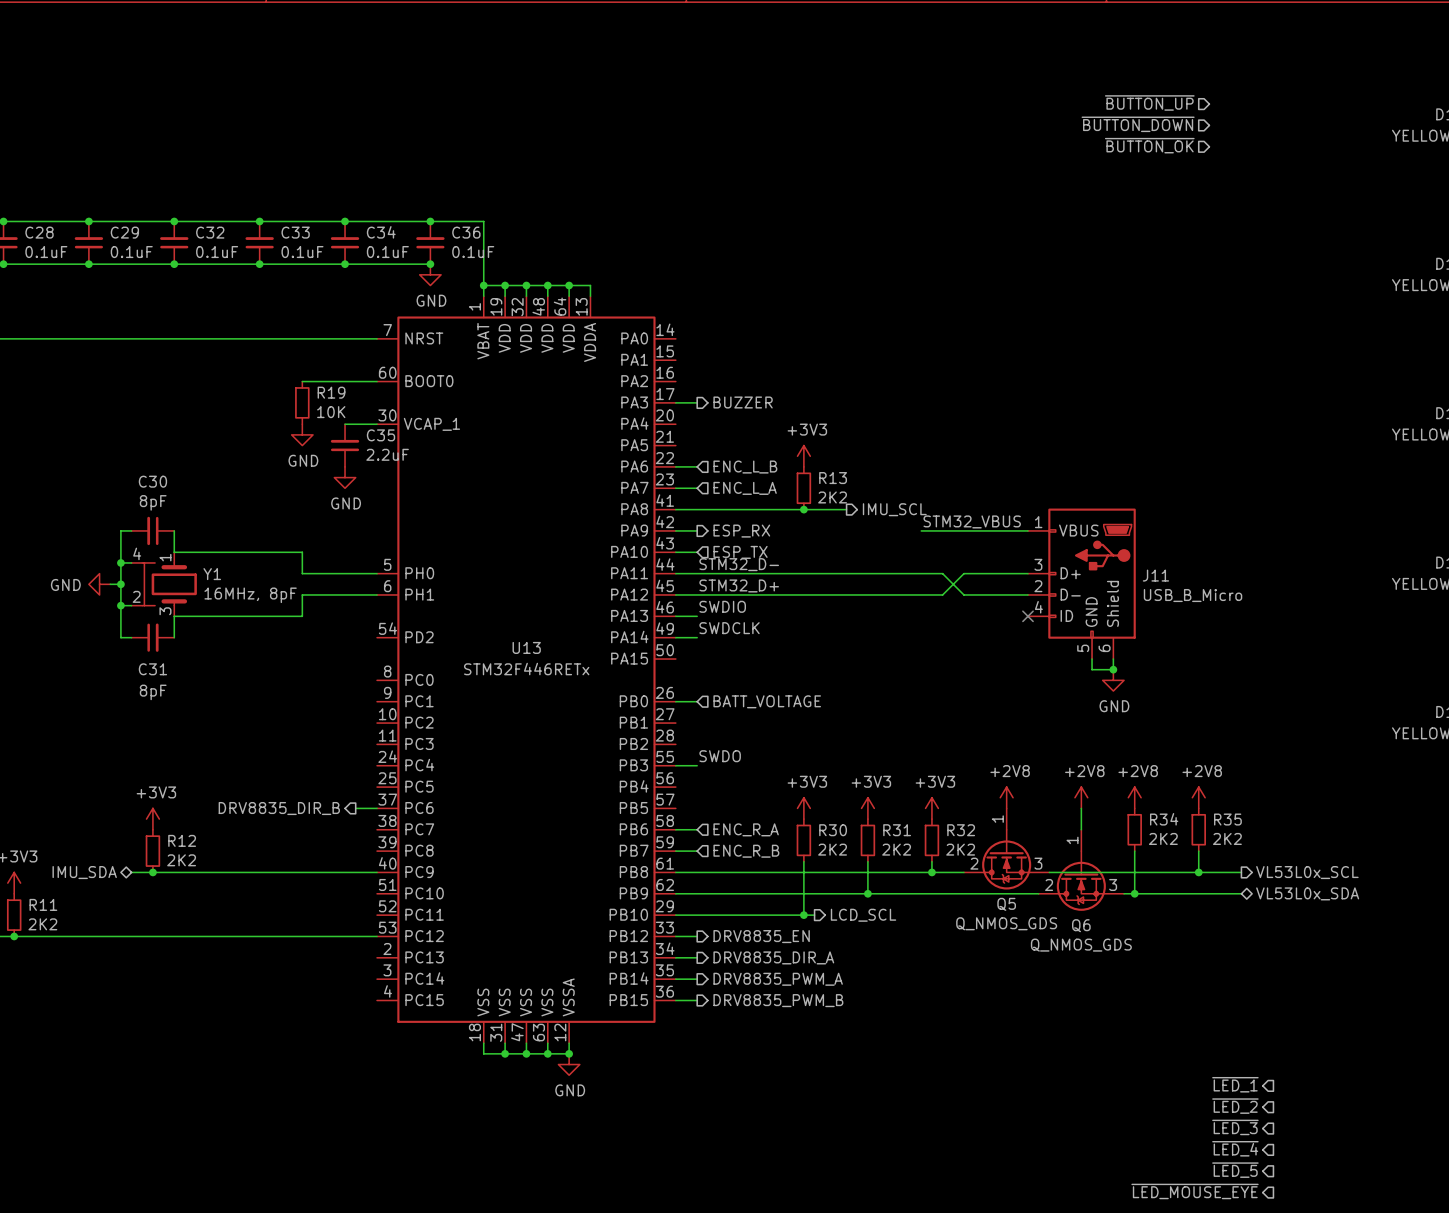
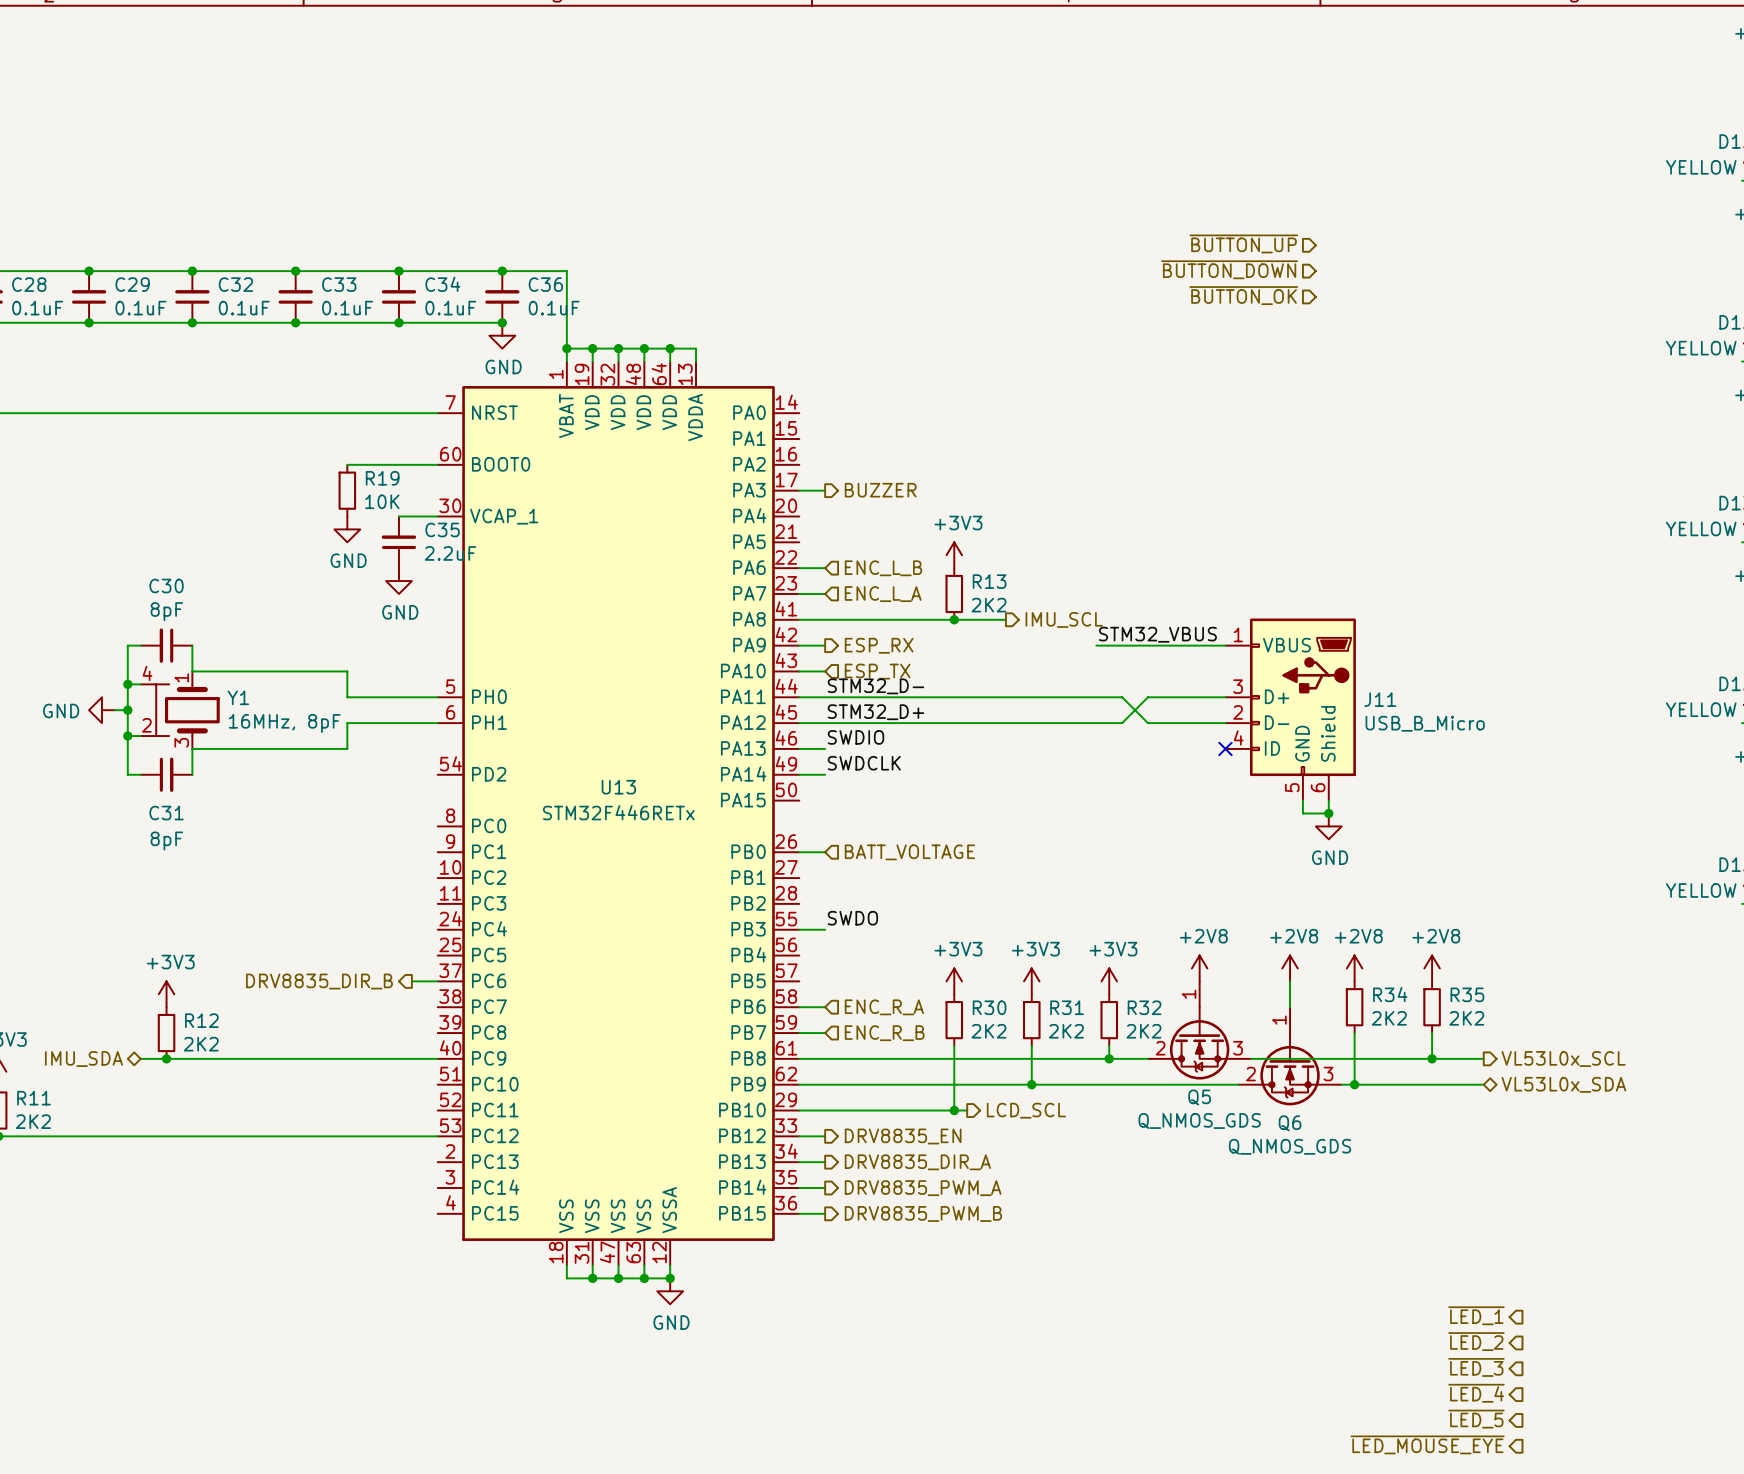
hierarchical label position: ~{BUTTON_UP} (1149, 102) -> ~{BUTTON_UP} (1243, 243)
hierarchical label position: ~{BUTTON_DOWN} (1138, 124) -> ~{BUTTON_DOWN} (1229, 269)
hierarchical label position: ~{BUTTON_OK} (1149, 145) -> ~{BUTTON_OK} (1243, 295)

